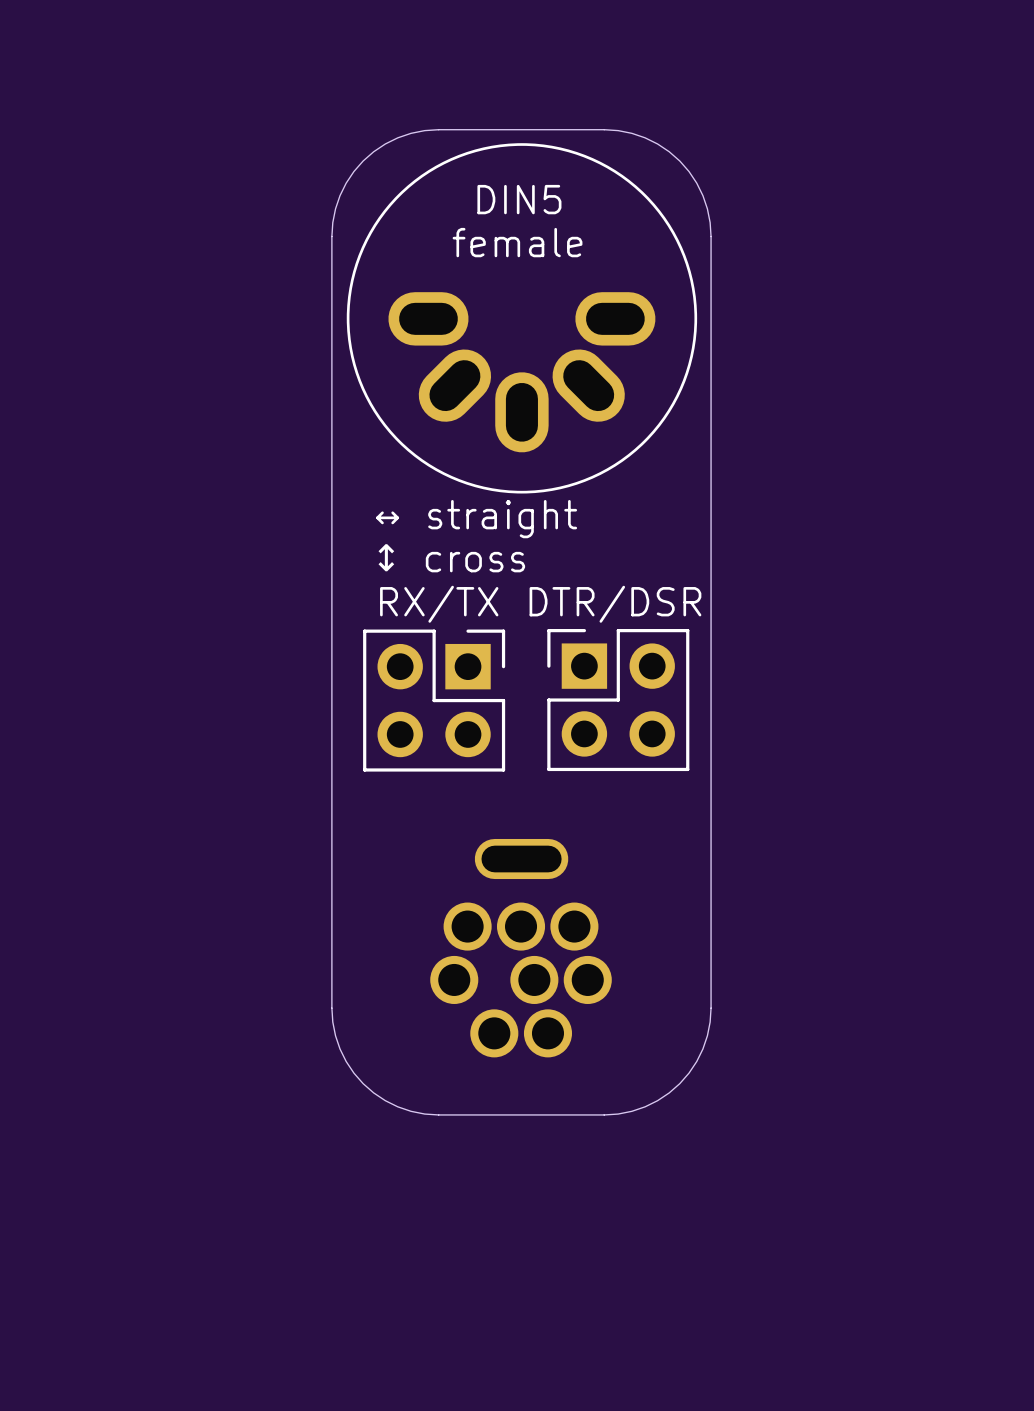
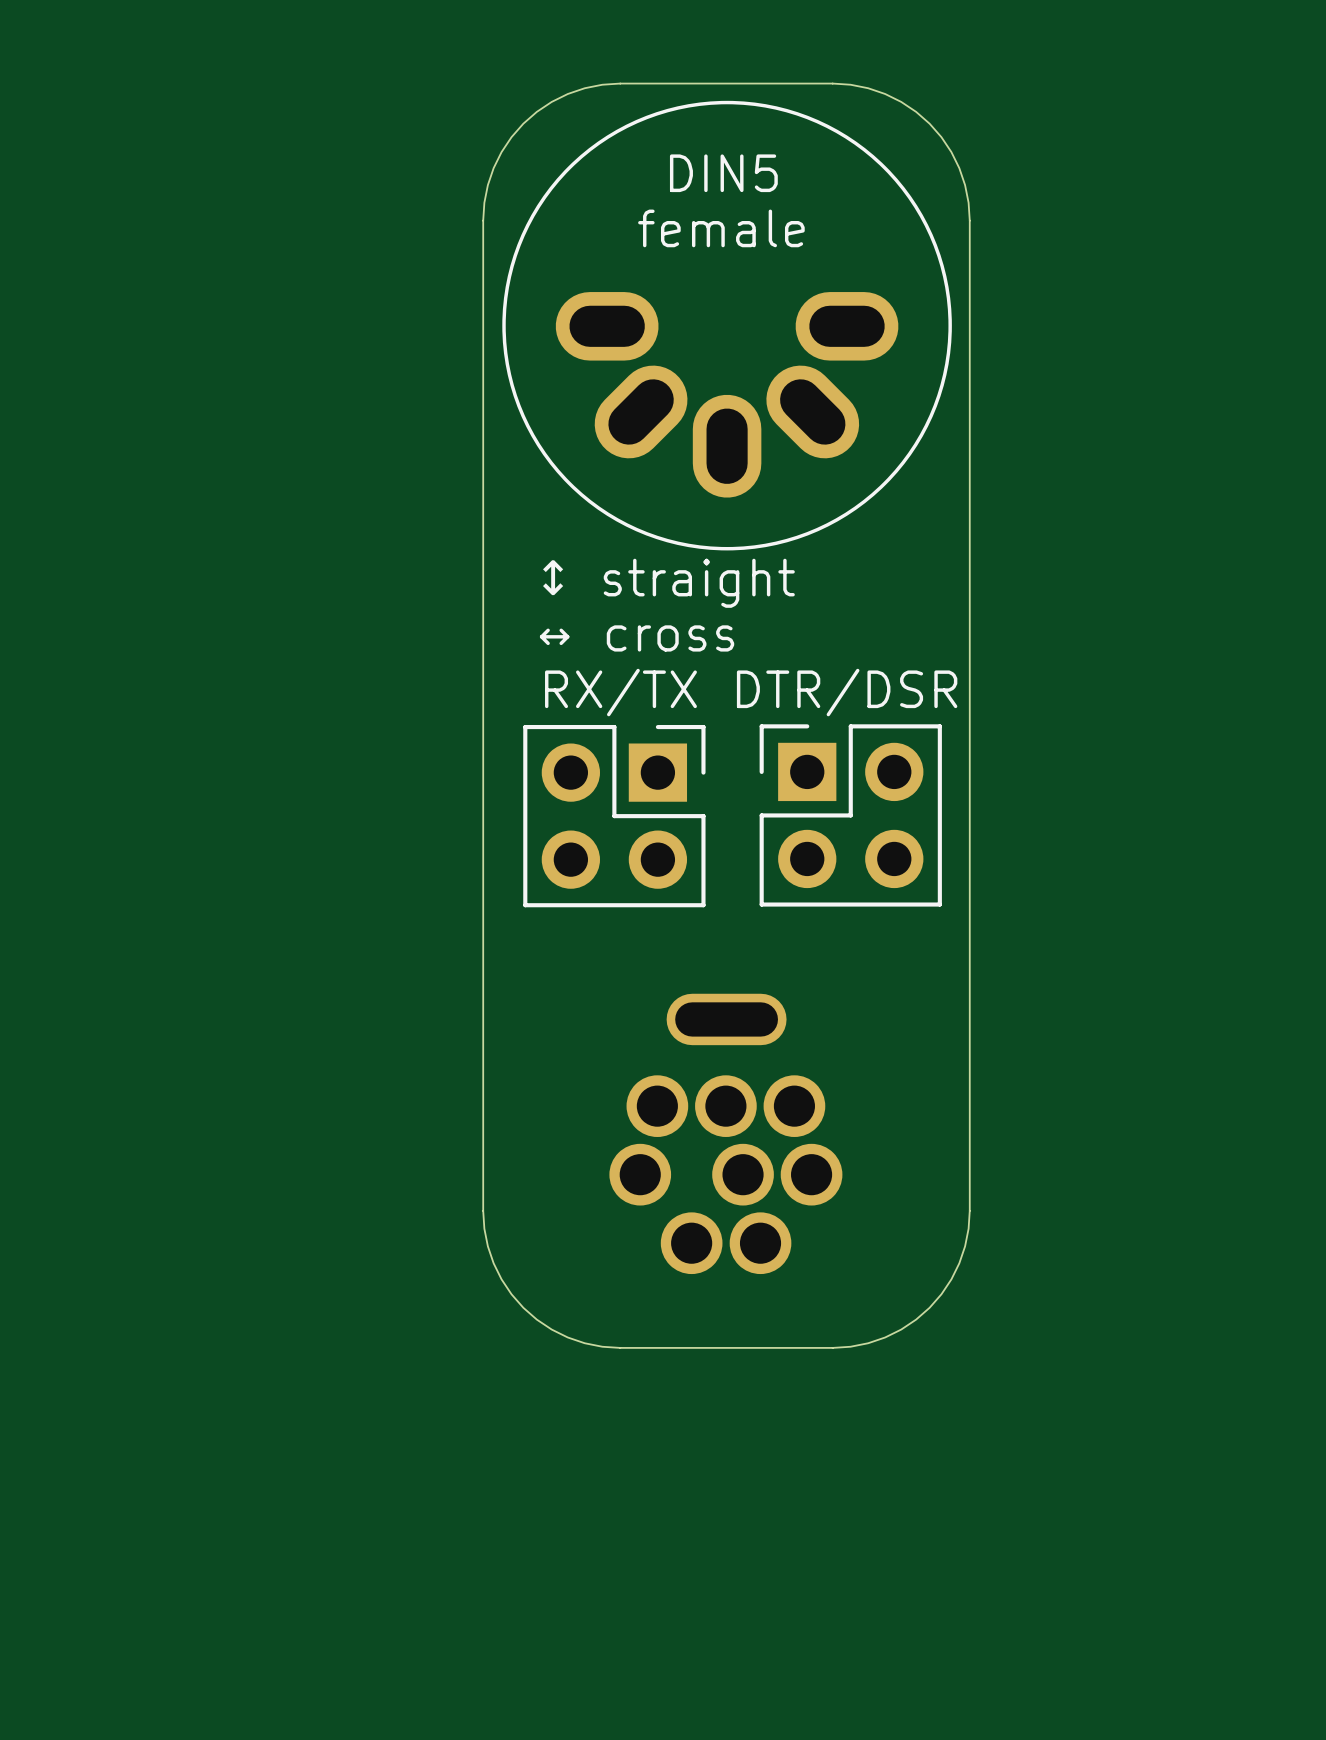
text: ↔ straight (476, 519) -> ↕ straight (668, 583)
text: ↕ cross (451, 557) -> ↔ cross (637, 638)

